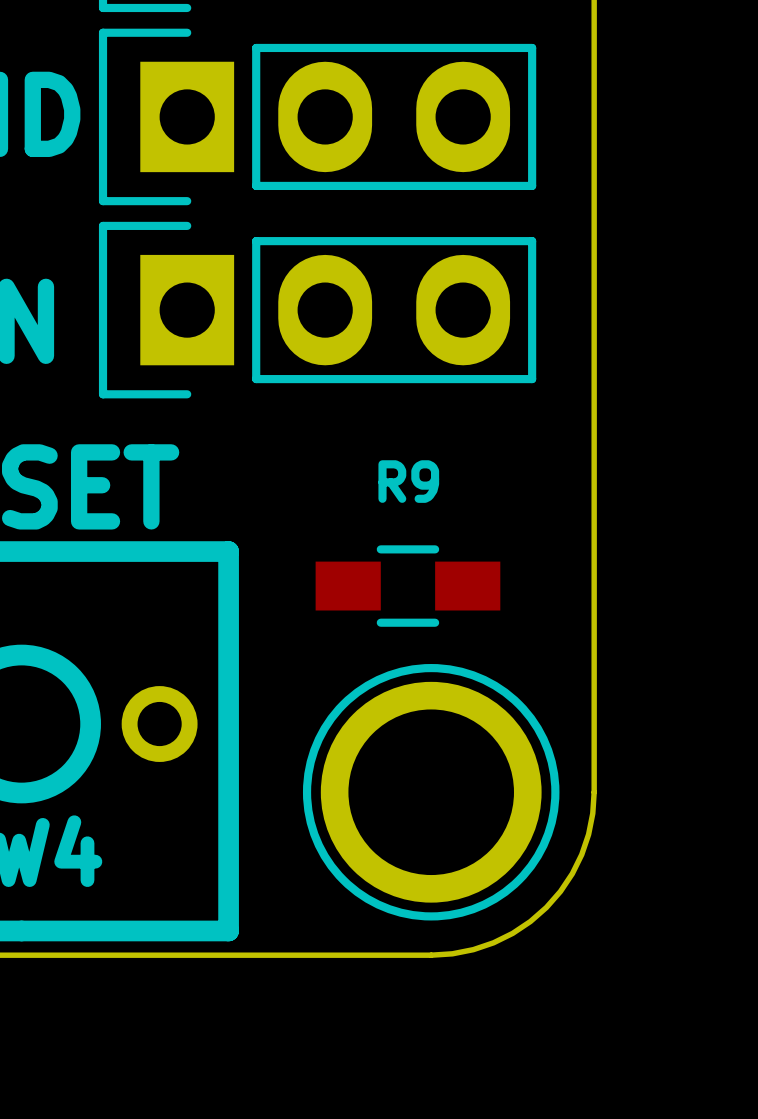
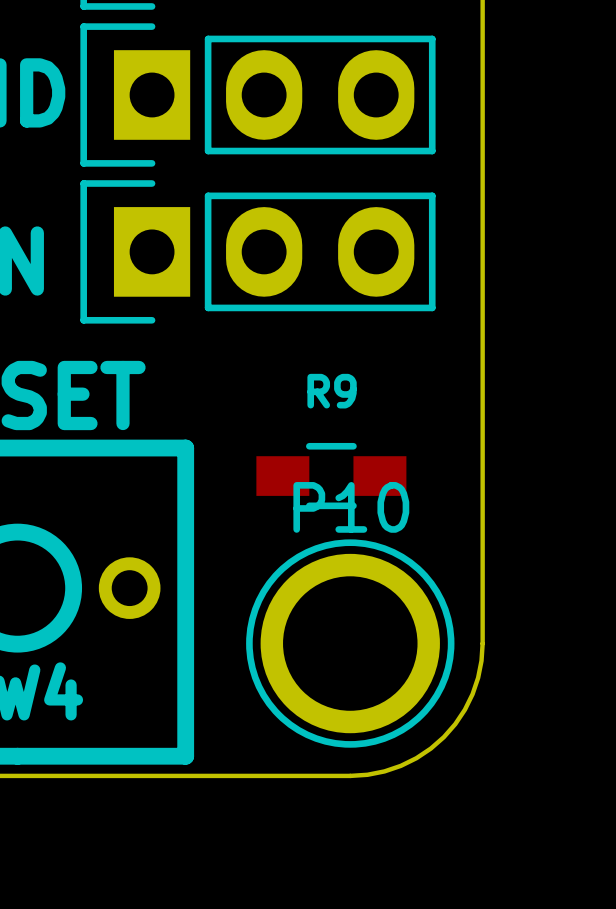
P10 name: none -> P10 (351, 507)

